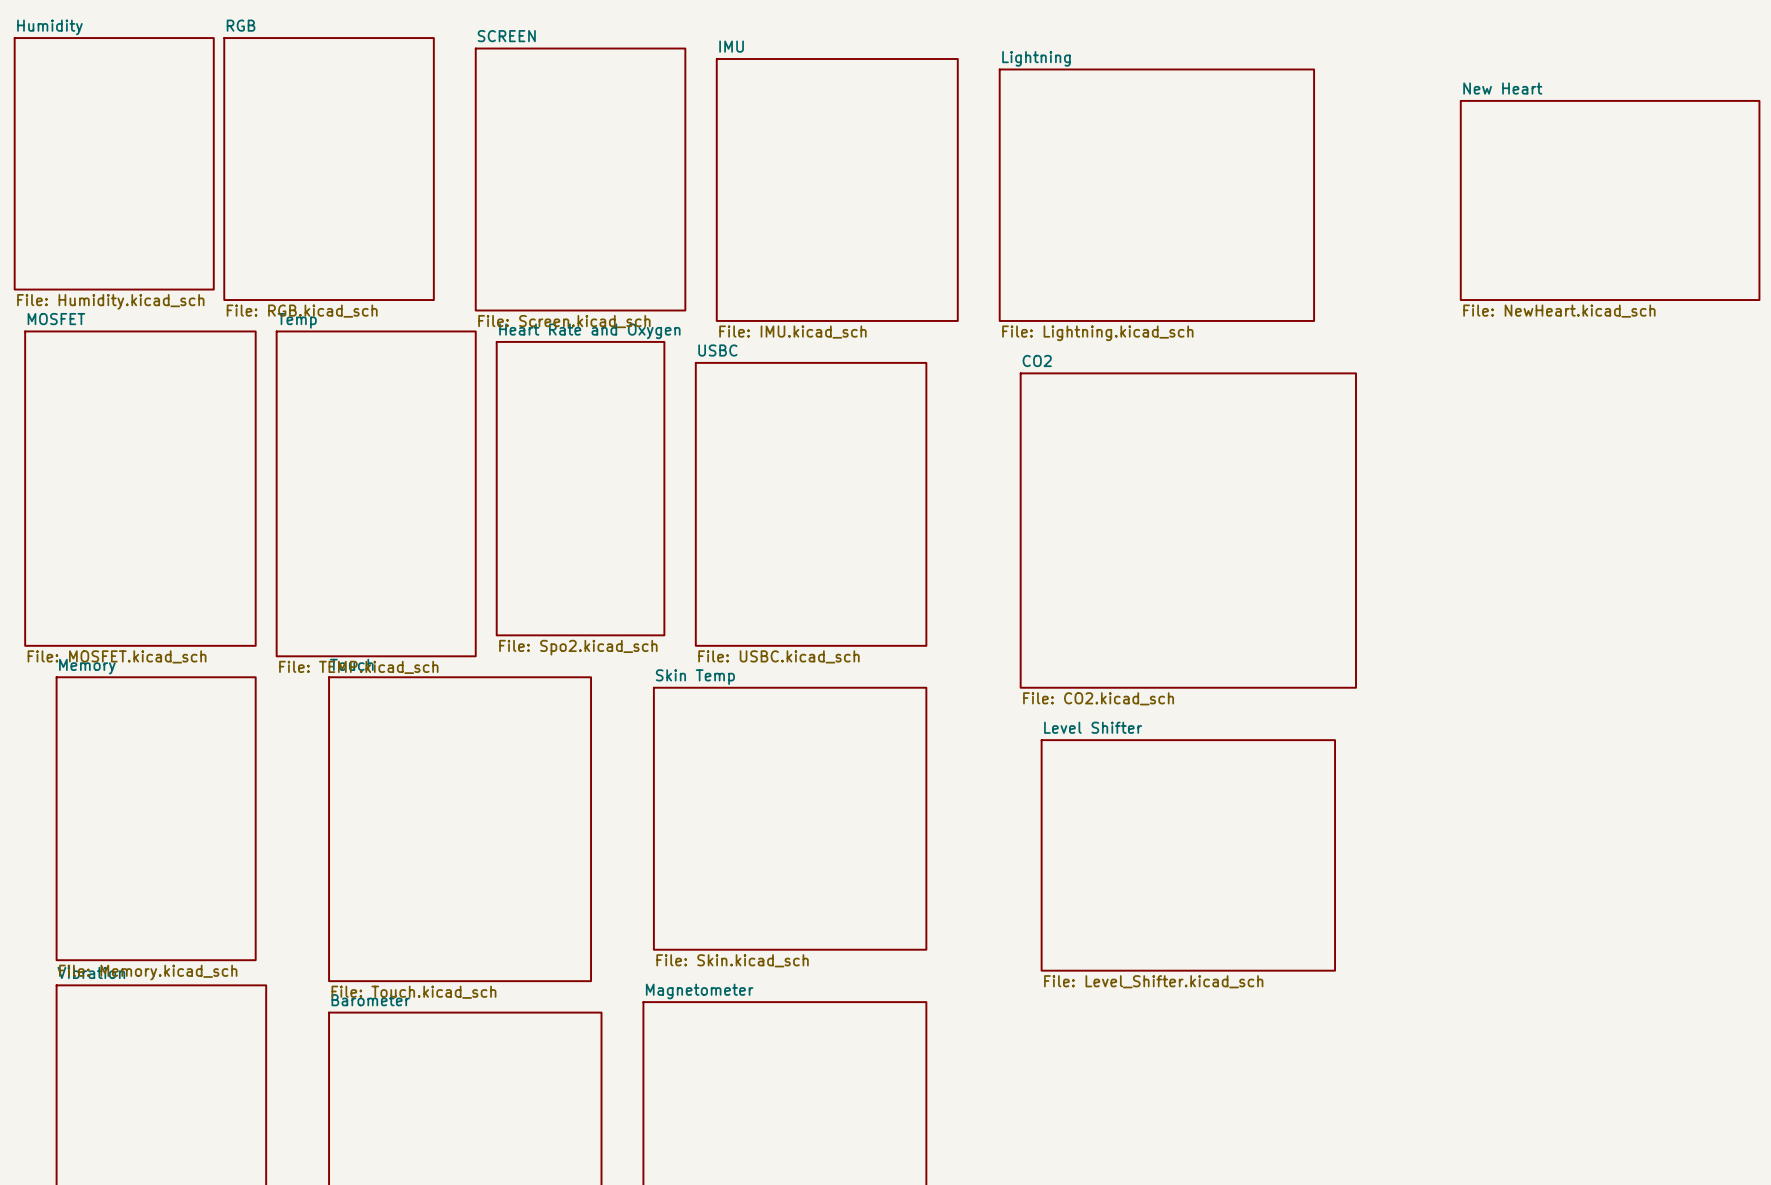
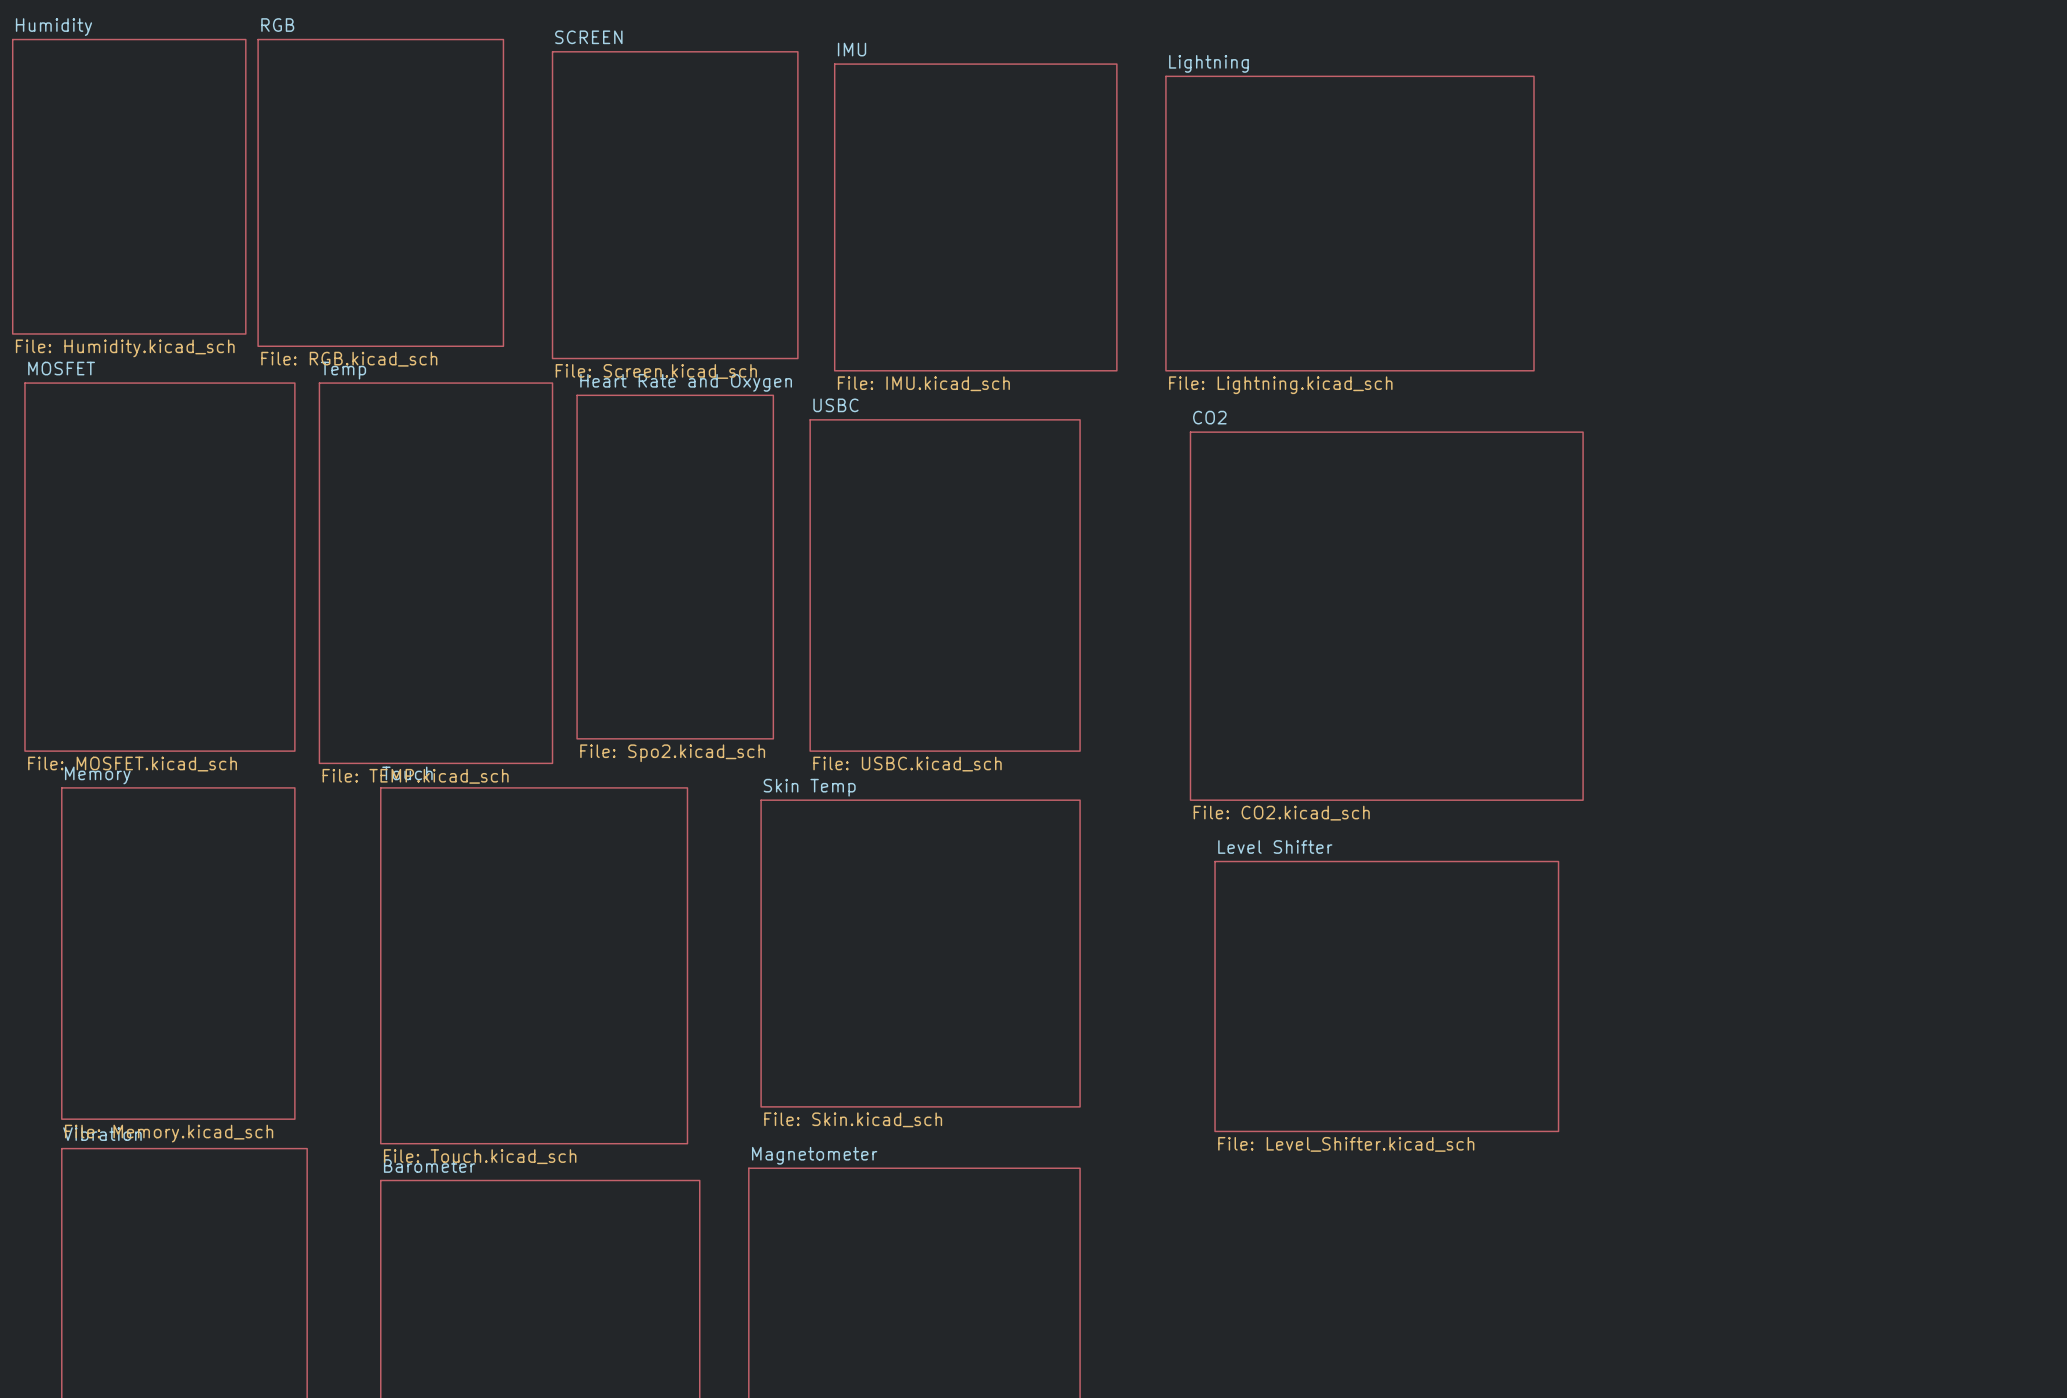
sheet New Heart: File: NewHeart.kicad_sch (1610, 200) -> none

